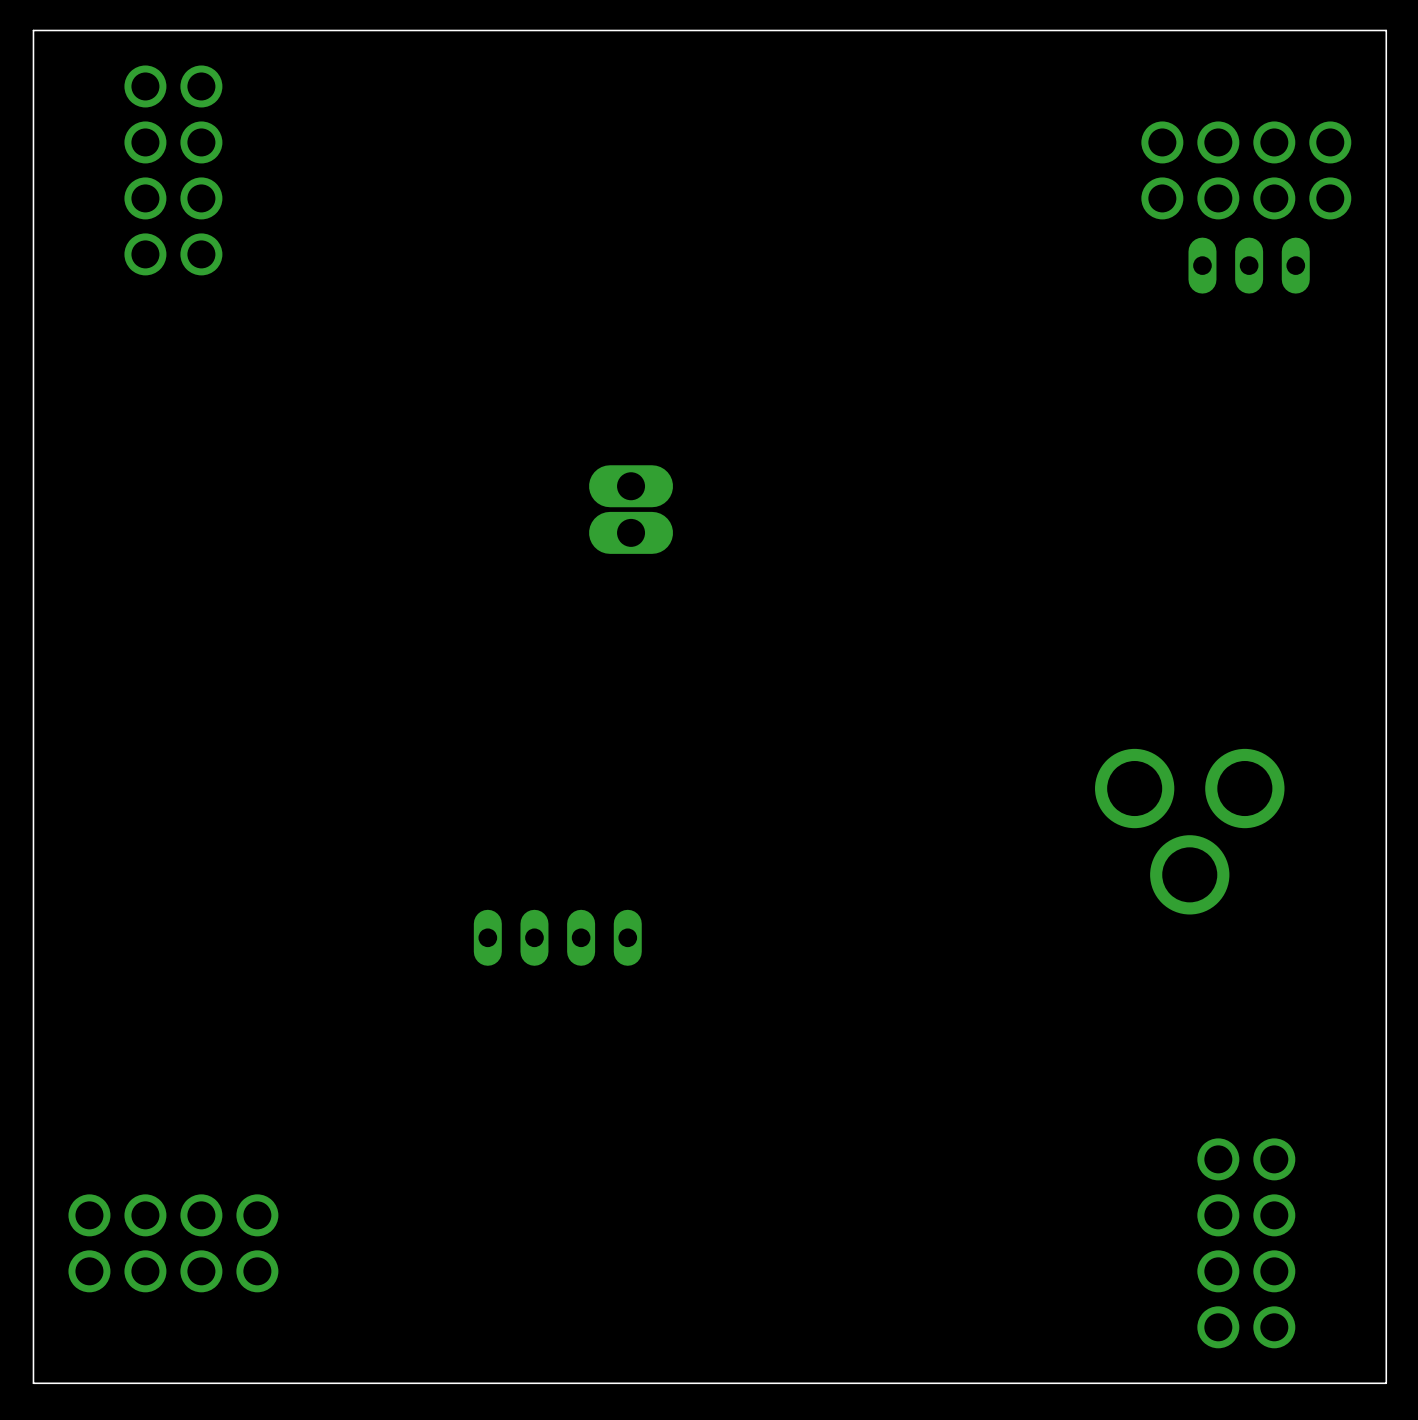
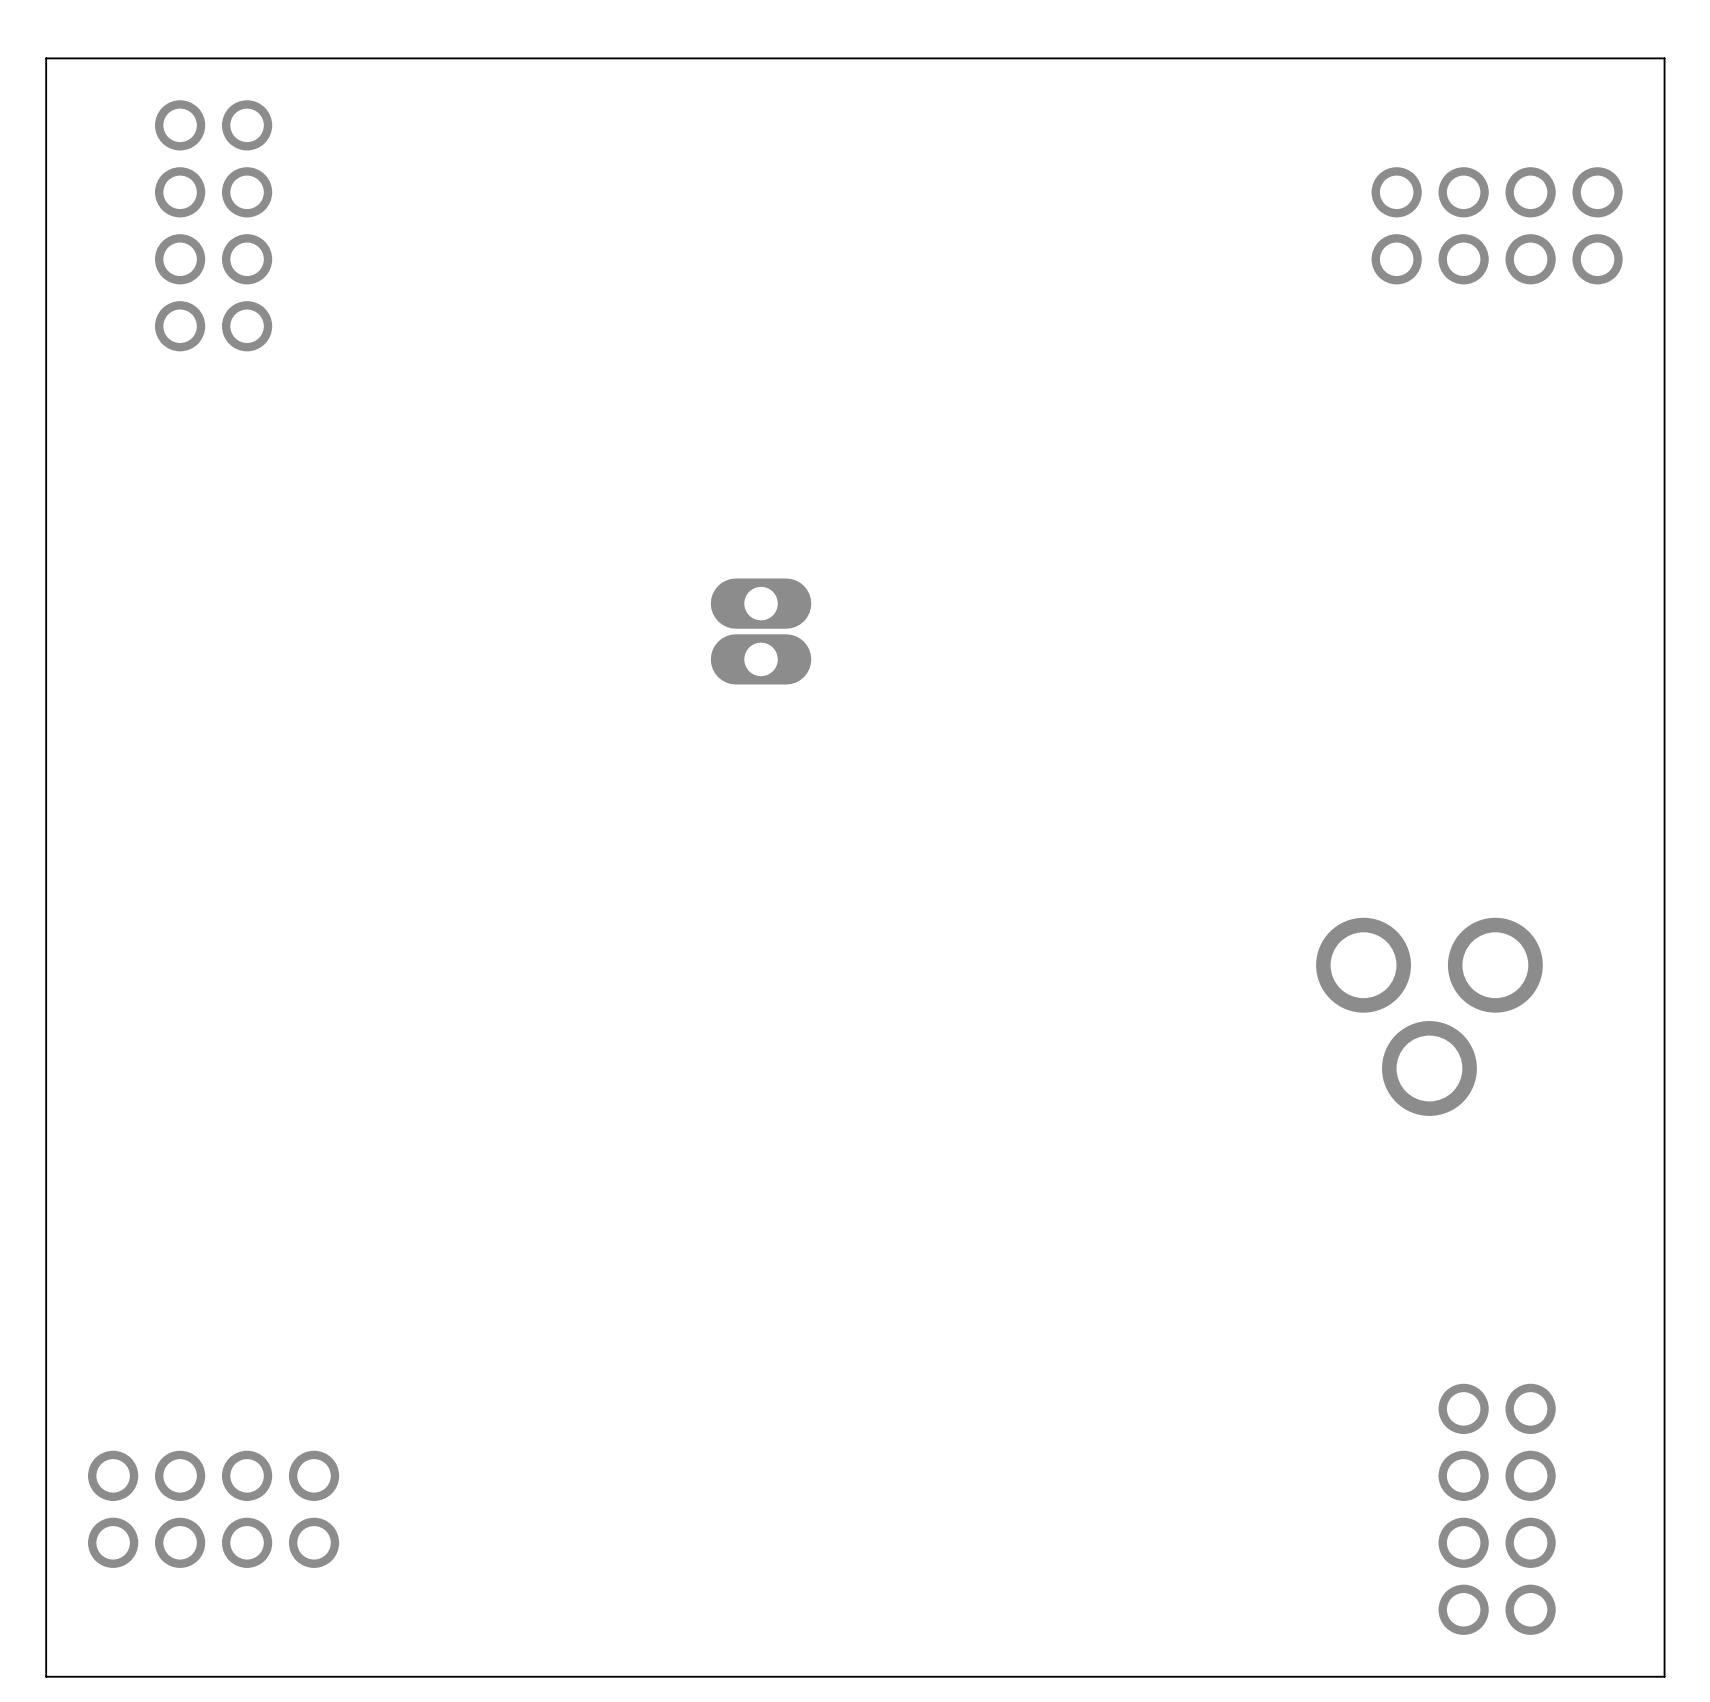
part: (1249, 265) -> none
part: (557, 937) -> none

